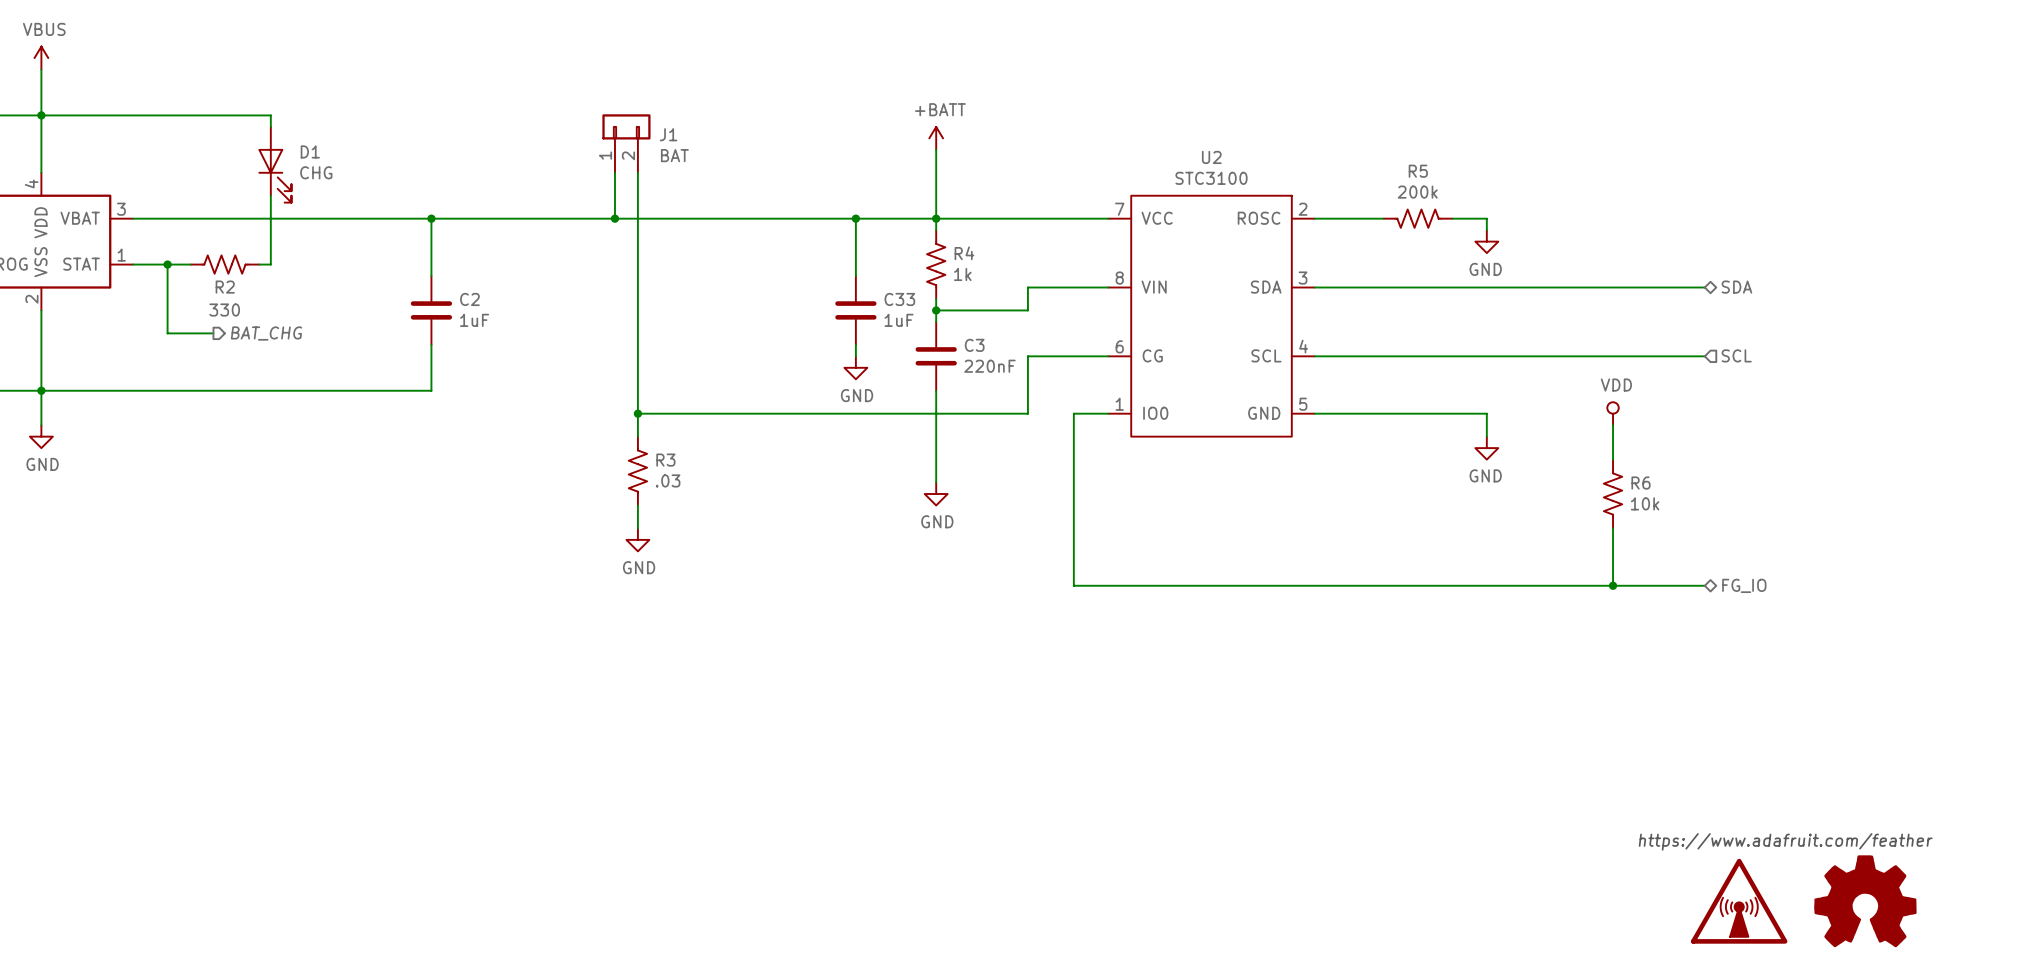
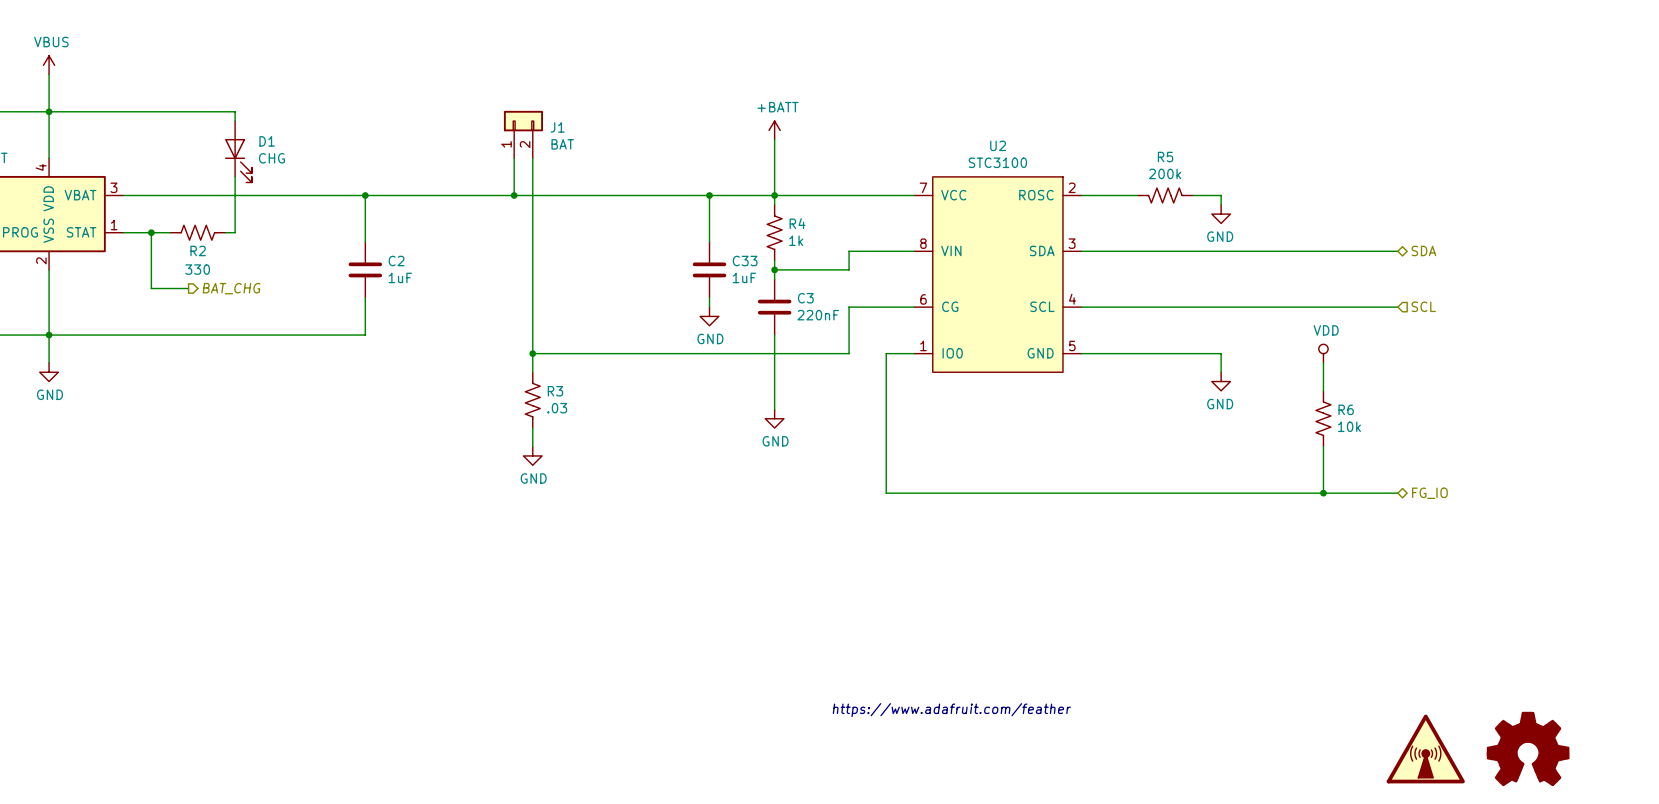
text: https://www.adafruit.com/feather (1785, 841) -> none
text: none -> https://www.adafruit.com/feather (951, 710)

